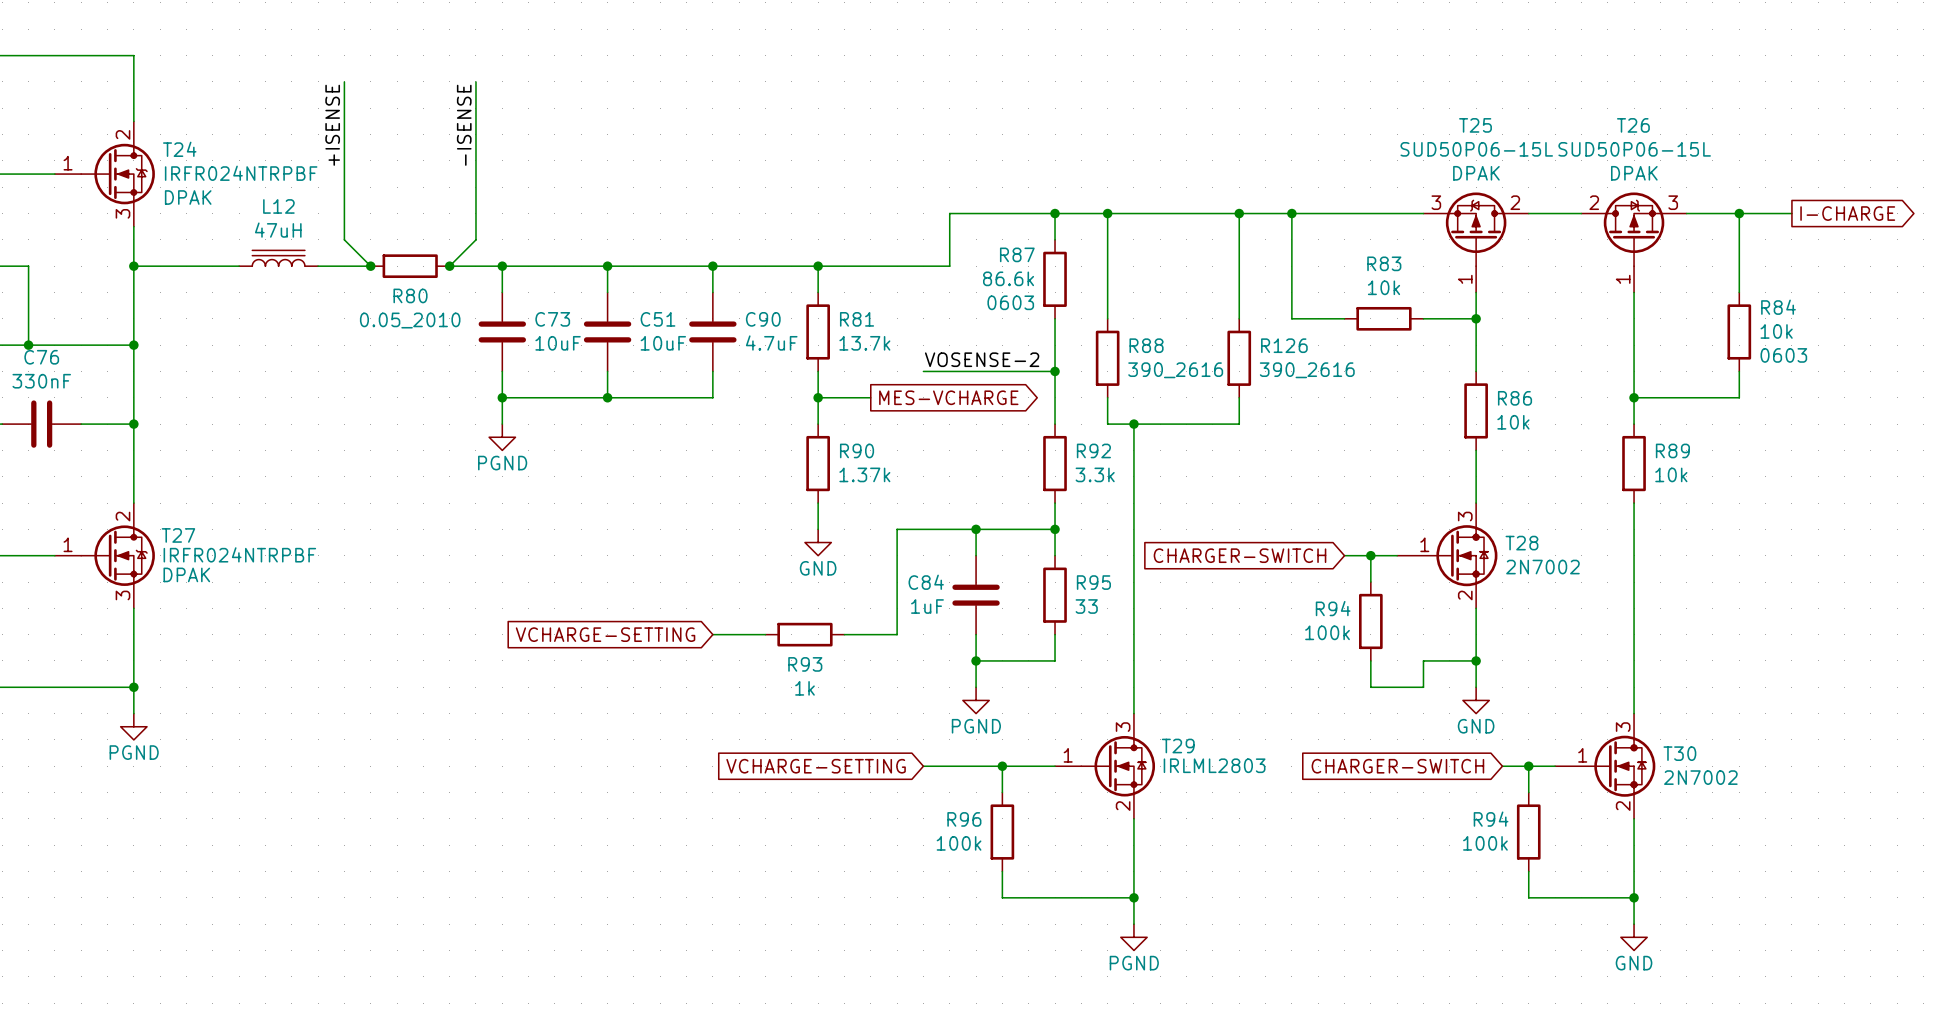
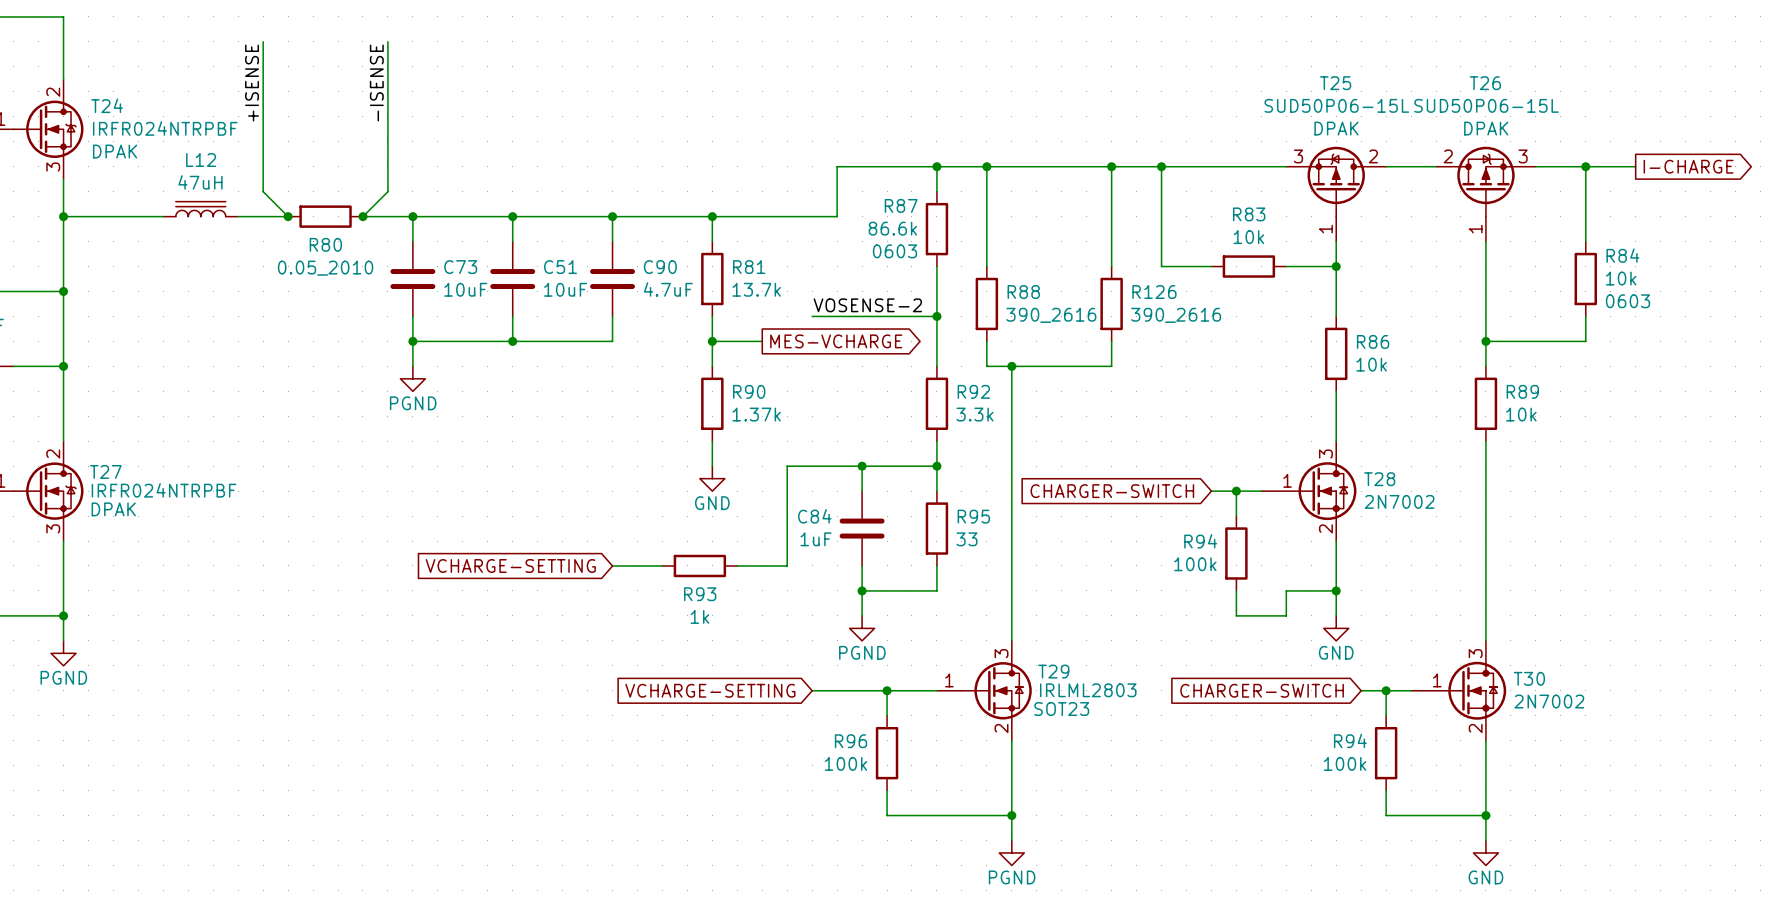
T29 text: none -> SOT23 (1061, 709)

